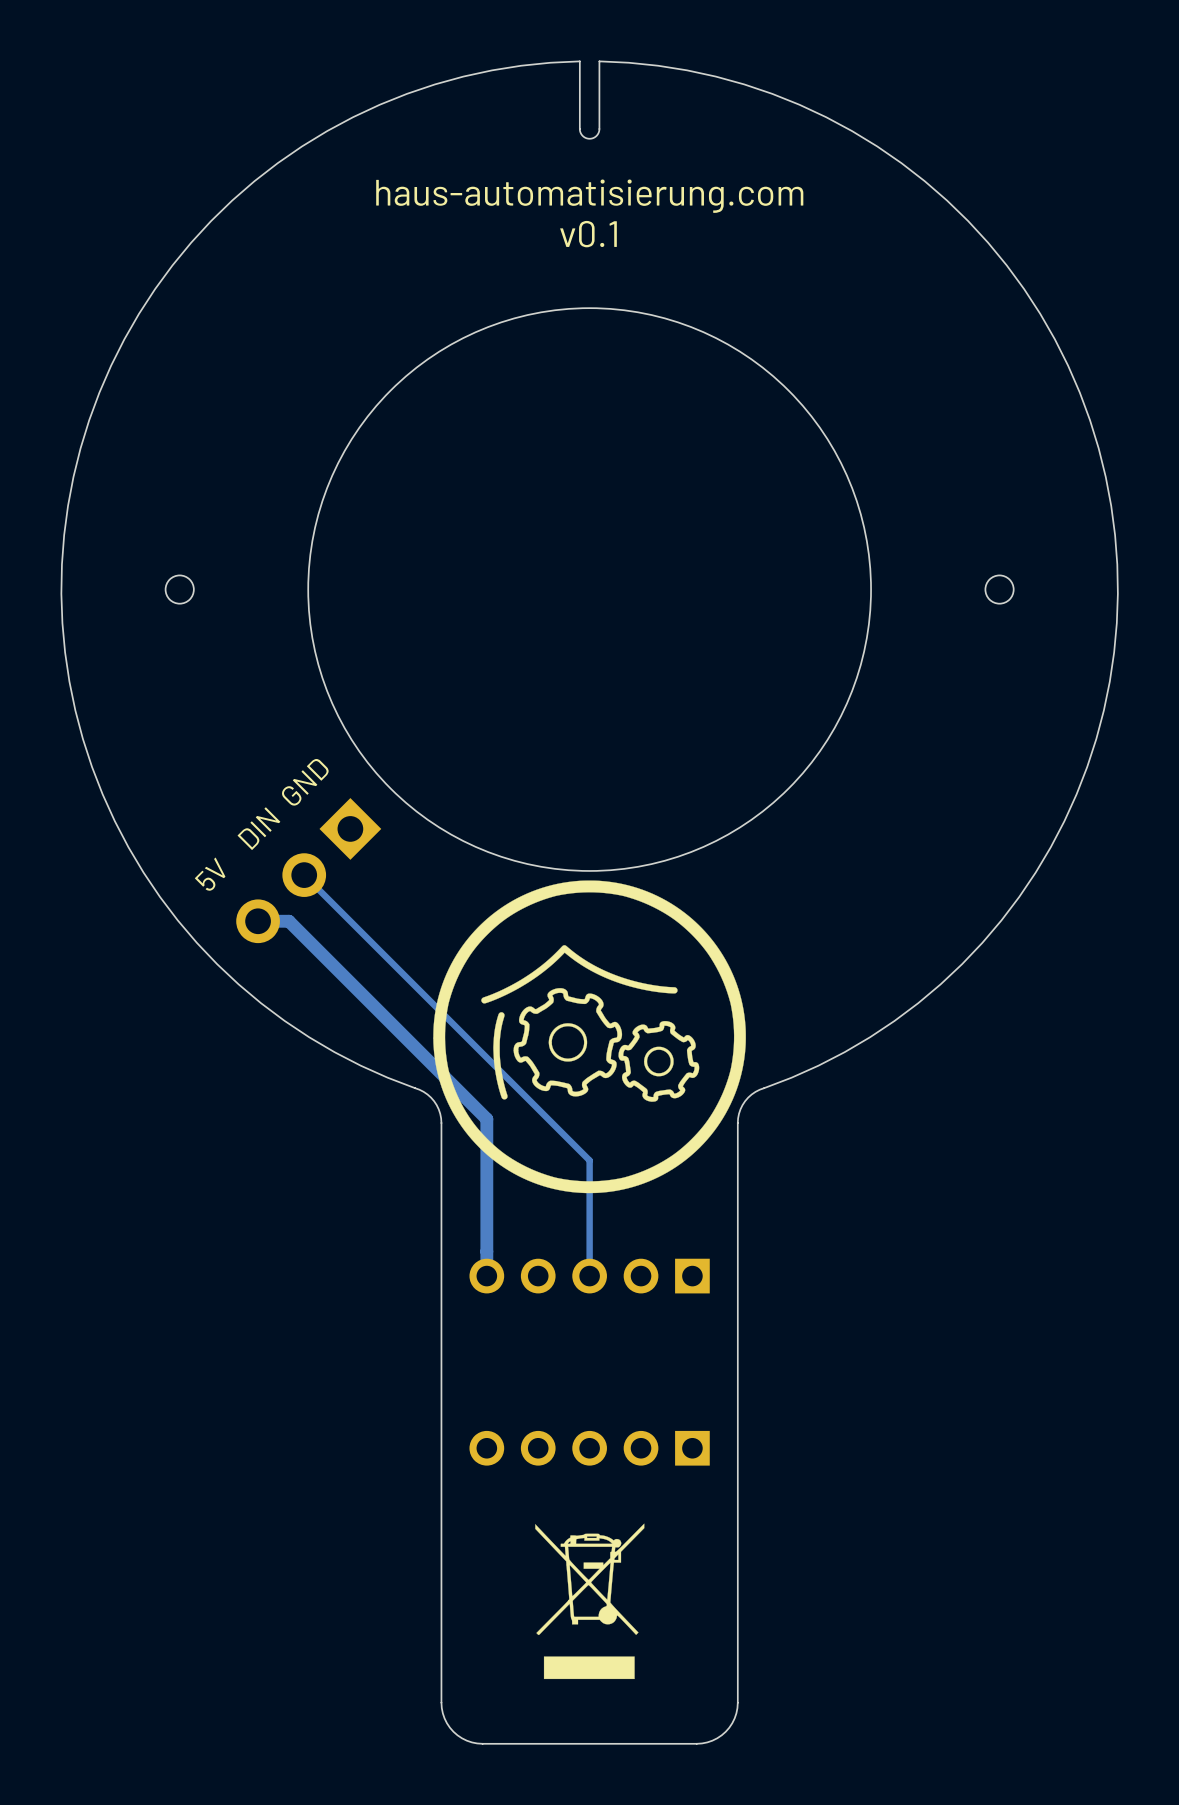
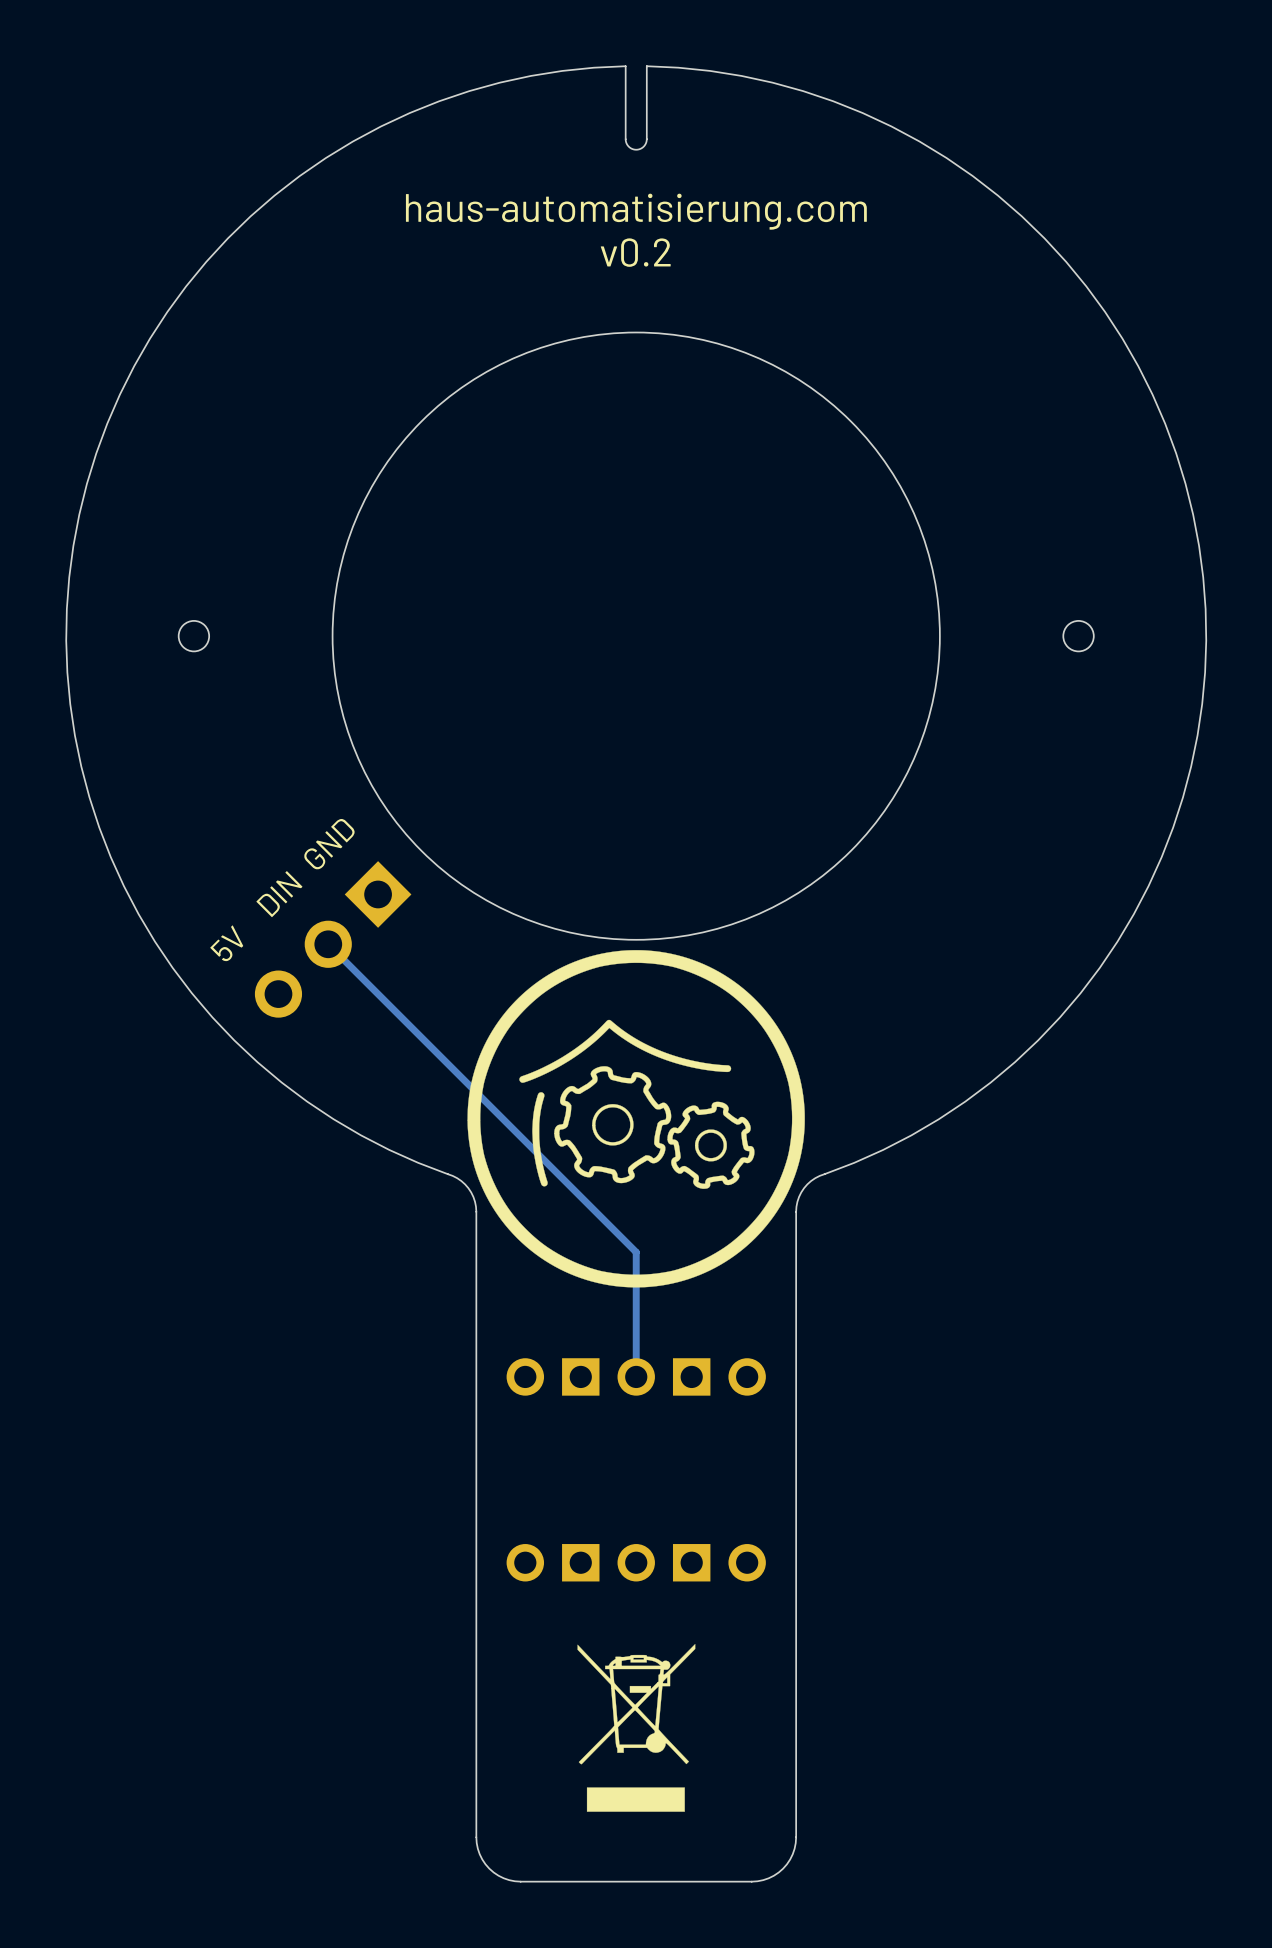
text: v0.1 (588, 234) -> v0.2 (635, 252)
track: (258, 921) (288, 921) (486, 1119) (486, 1276) -> none
part footprint: [469, 1258, 710, 1294] -> [506, 1358, 766, 1396]
part footprint: [469, 1430, 710, 1466] -> [506, 1544, 766, 1582]

